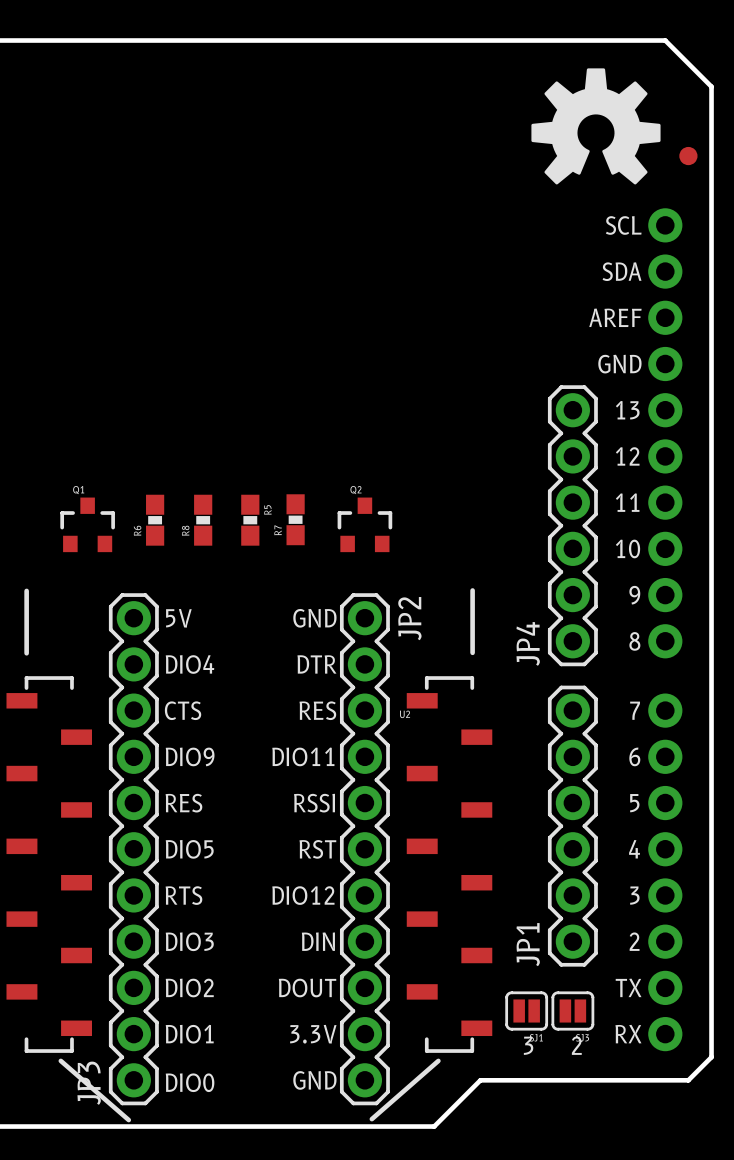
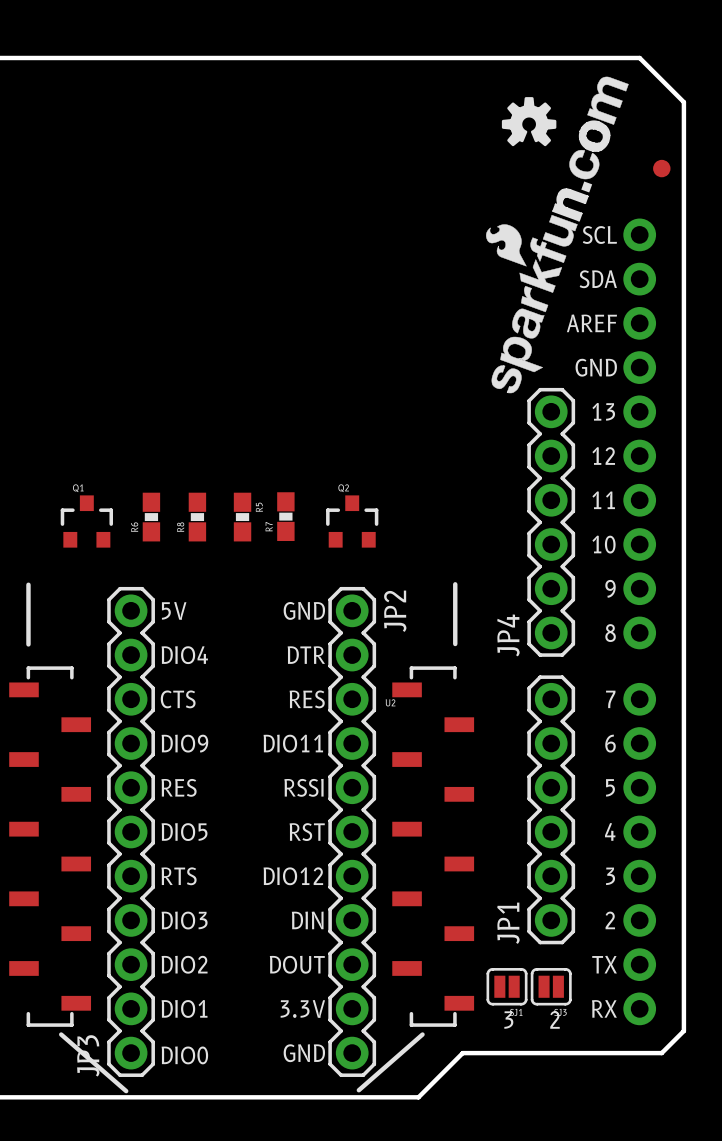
drawing: none -> [485, 76, 629, 394]
drawing: [531, 68, 661, 185] -> none

